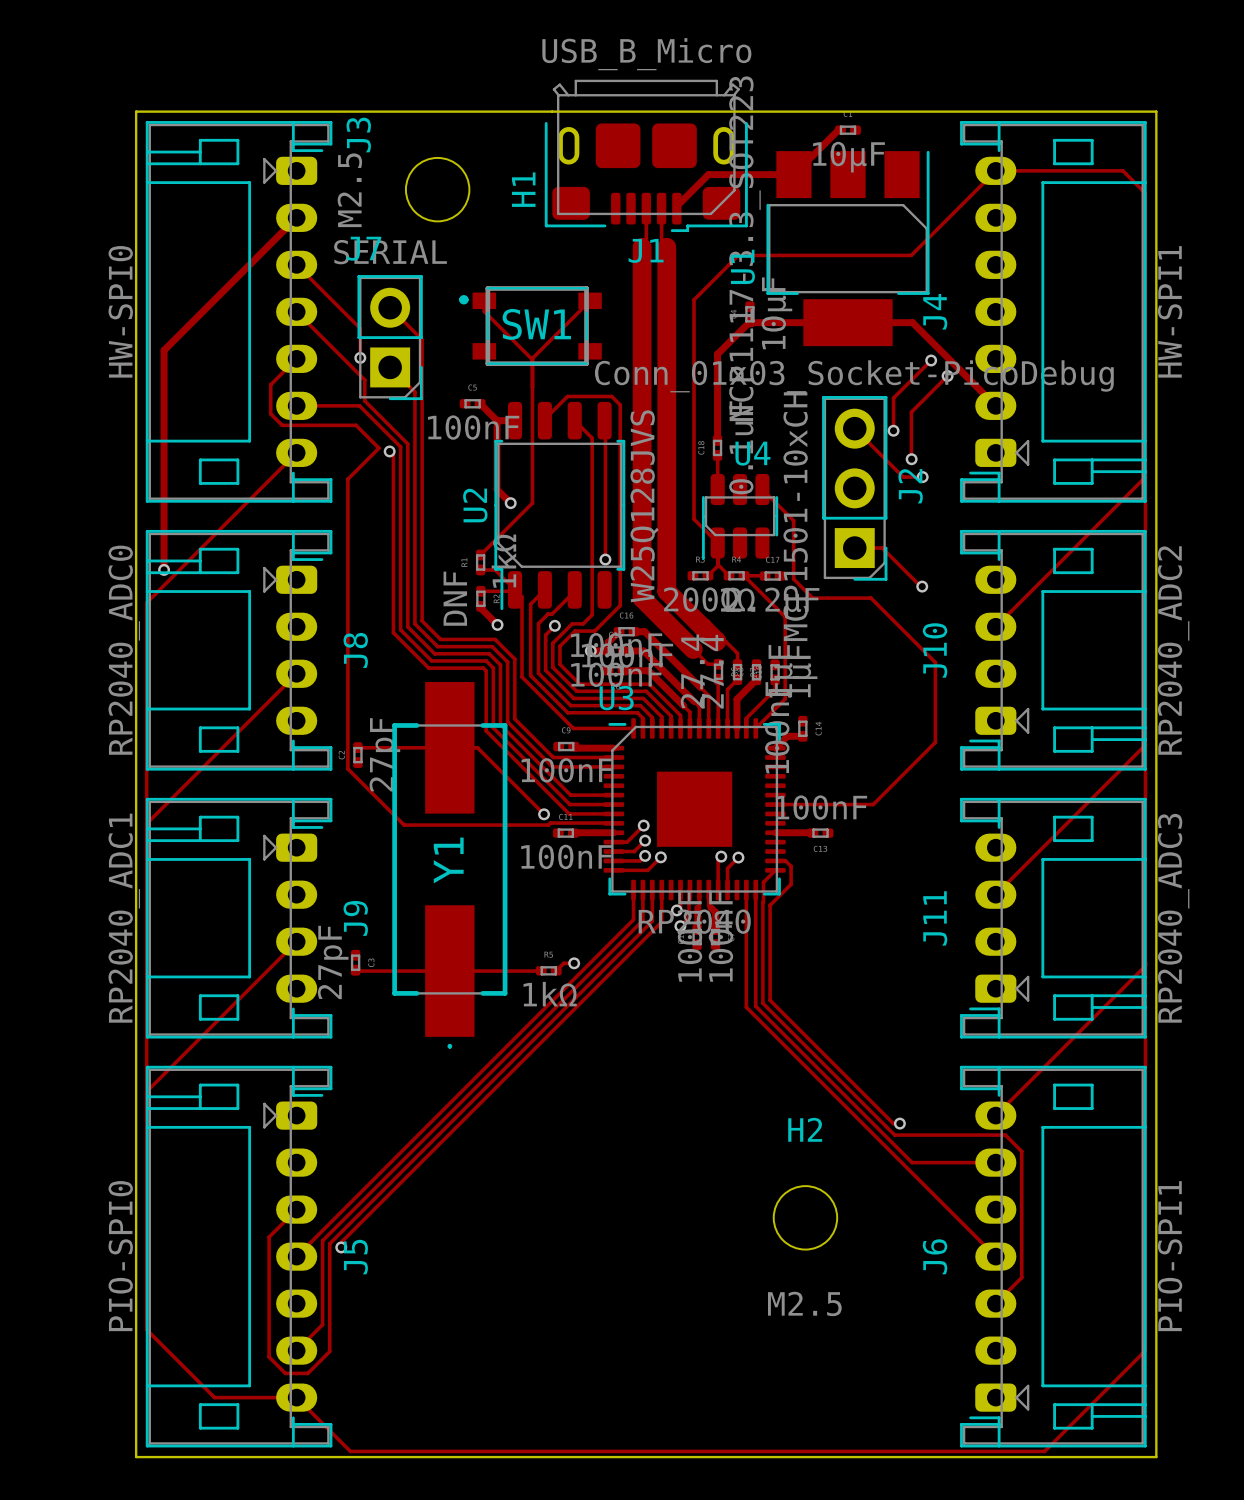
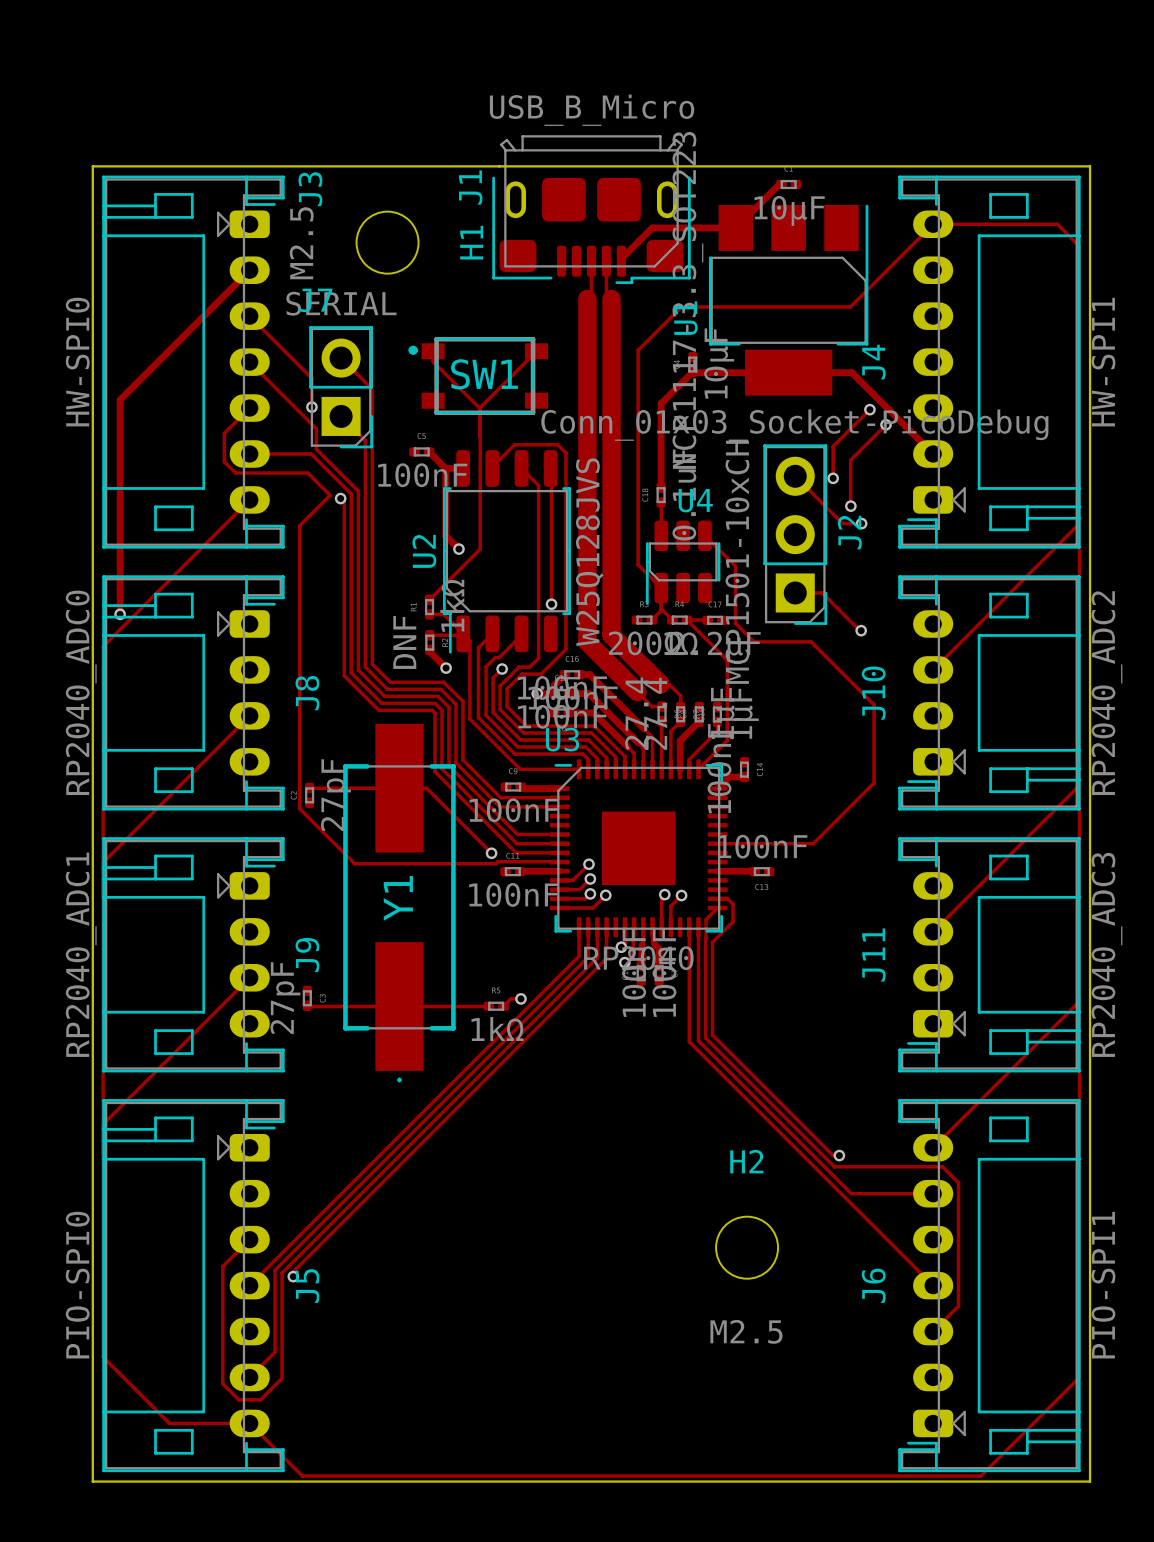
J1 name rotation: 0° (646, 250) -> 90° counterclockwise (470, 187)
J1 name position: J1 (646, 250) -> J1 (470, 187)

